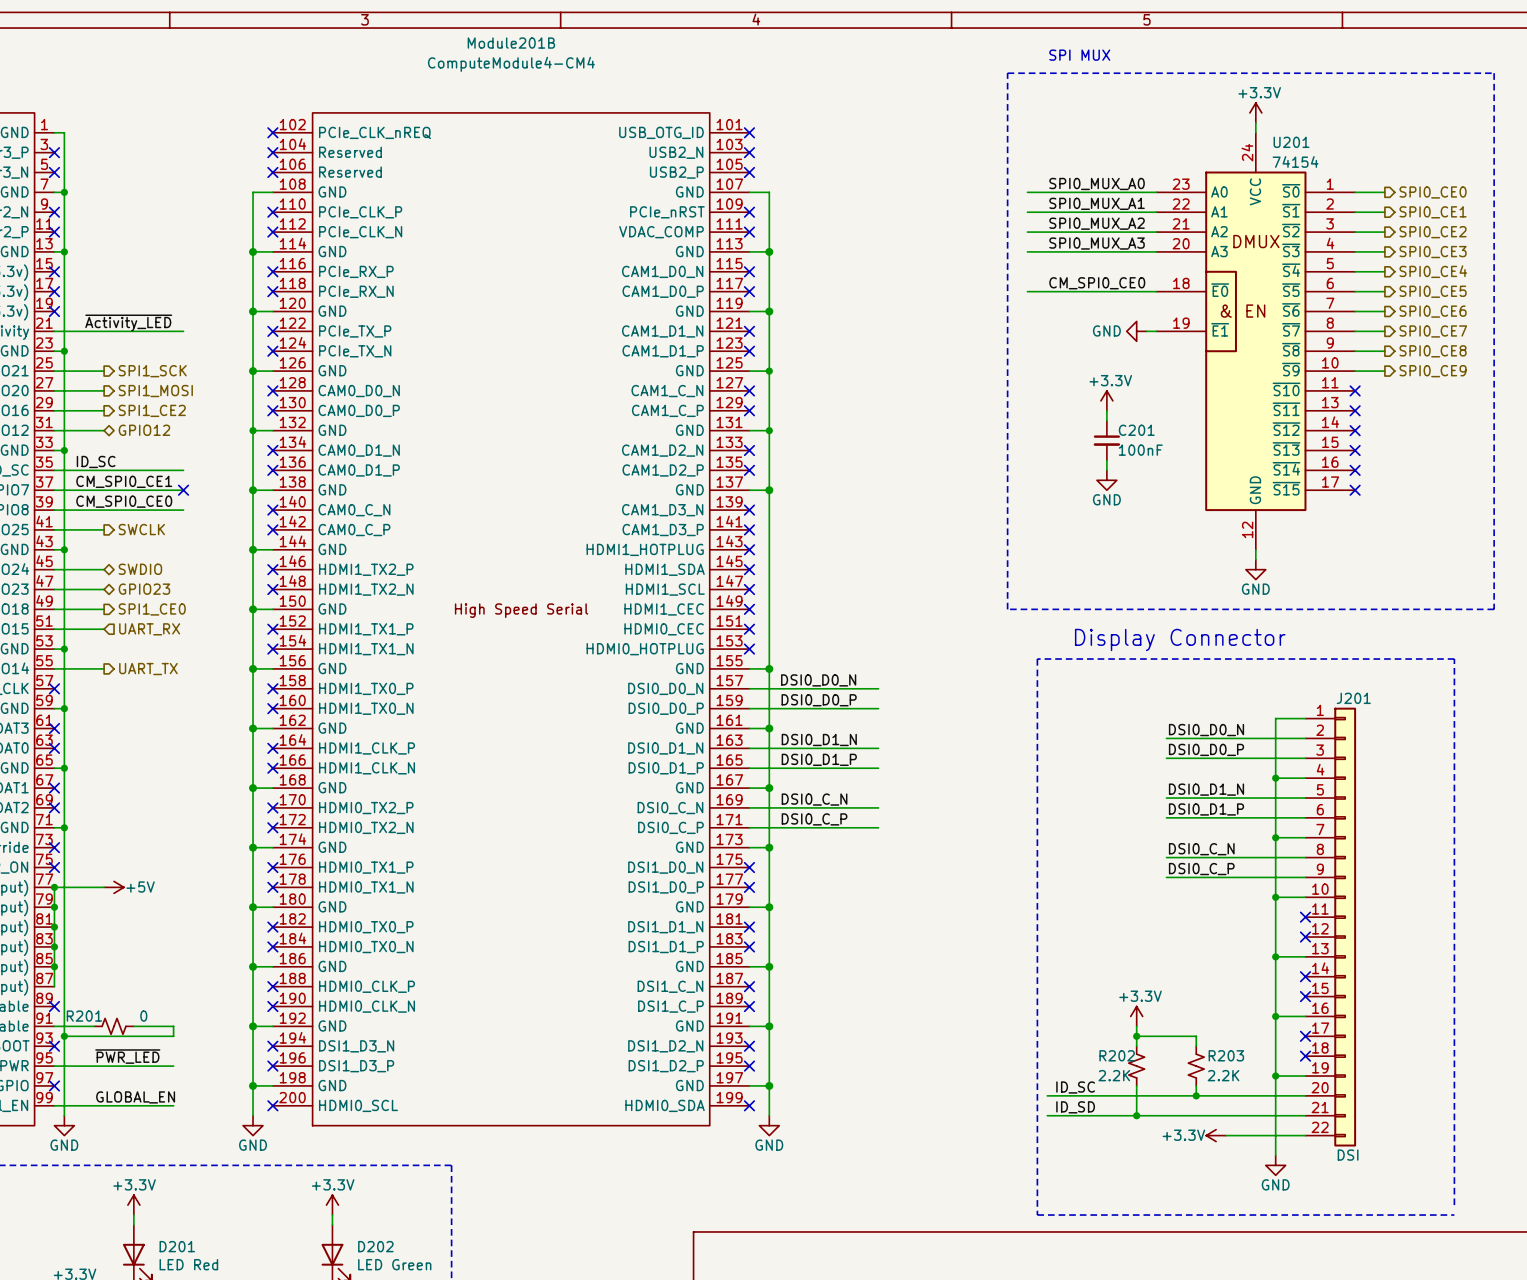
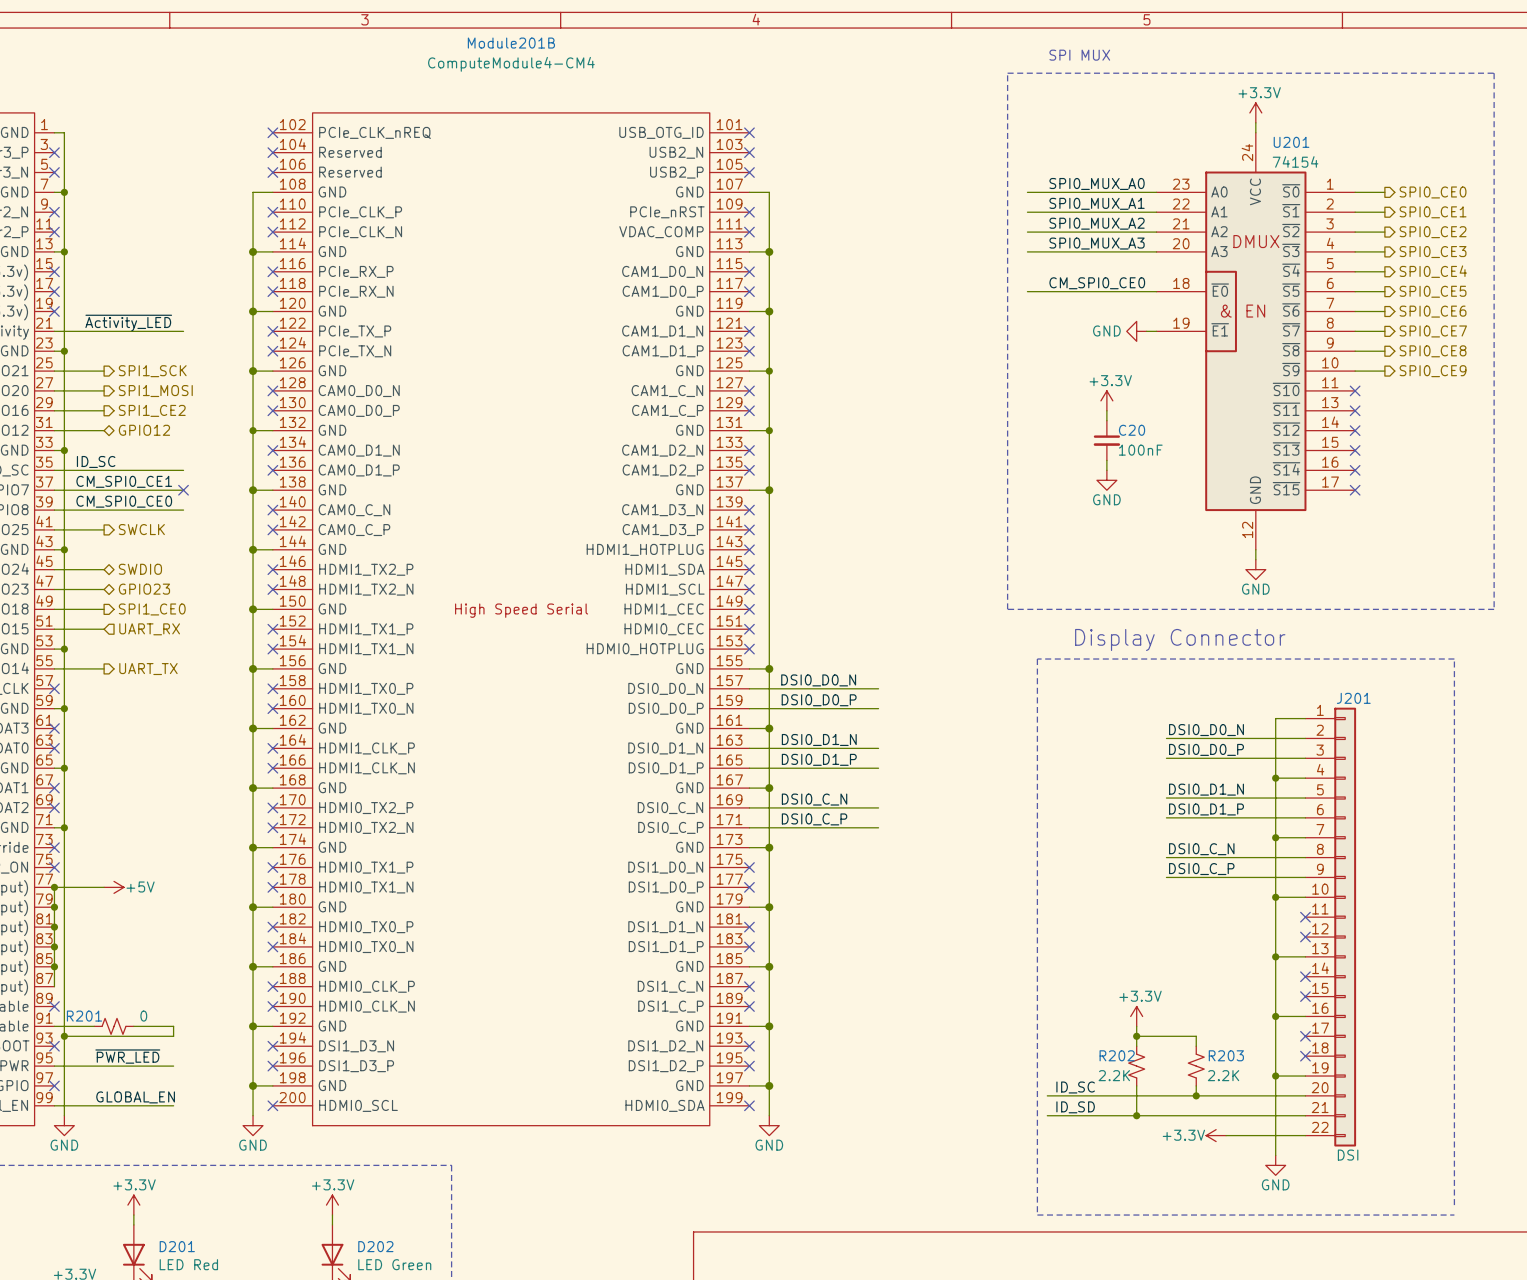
C201 name: C201 (1136, 430) -> C20 (1132, 430)

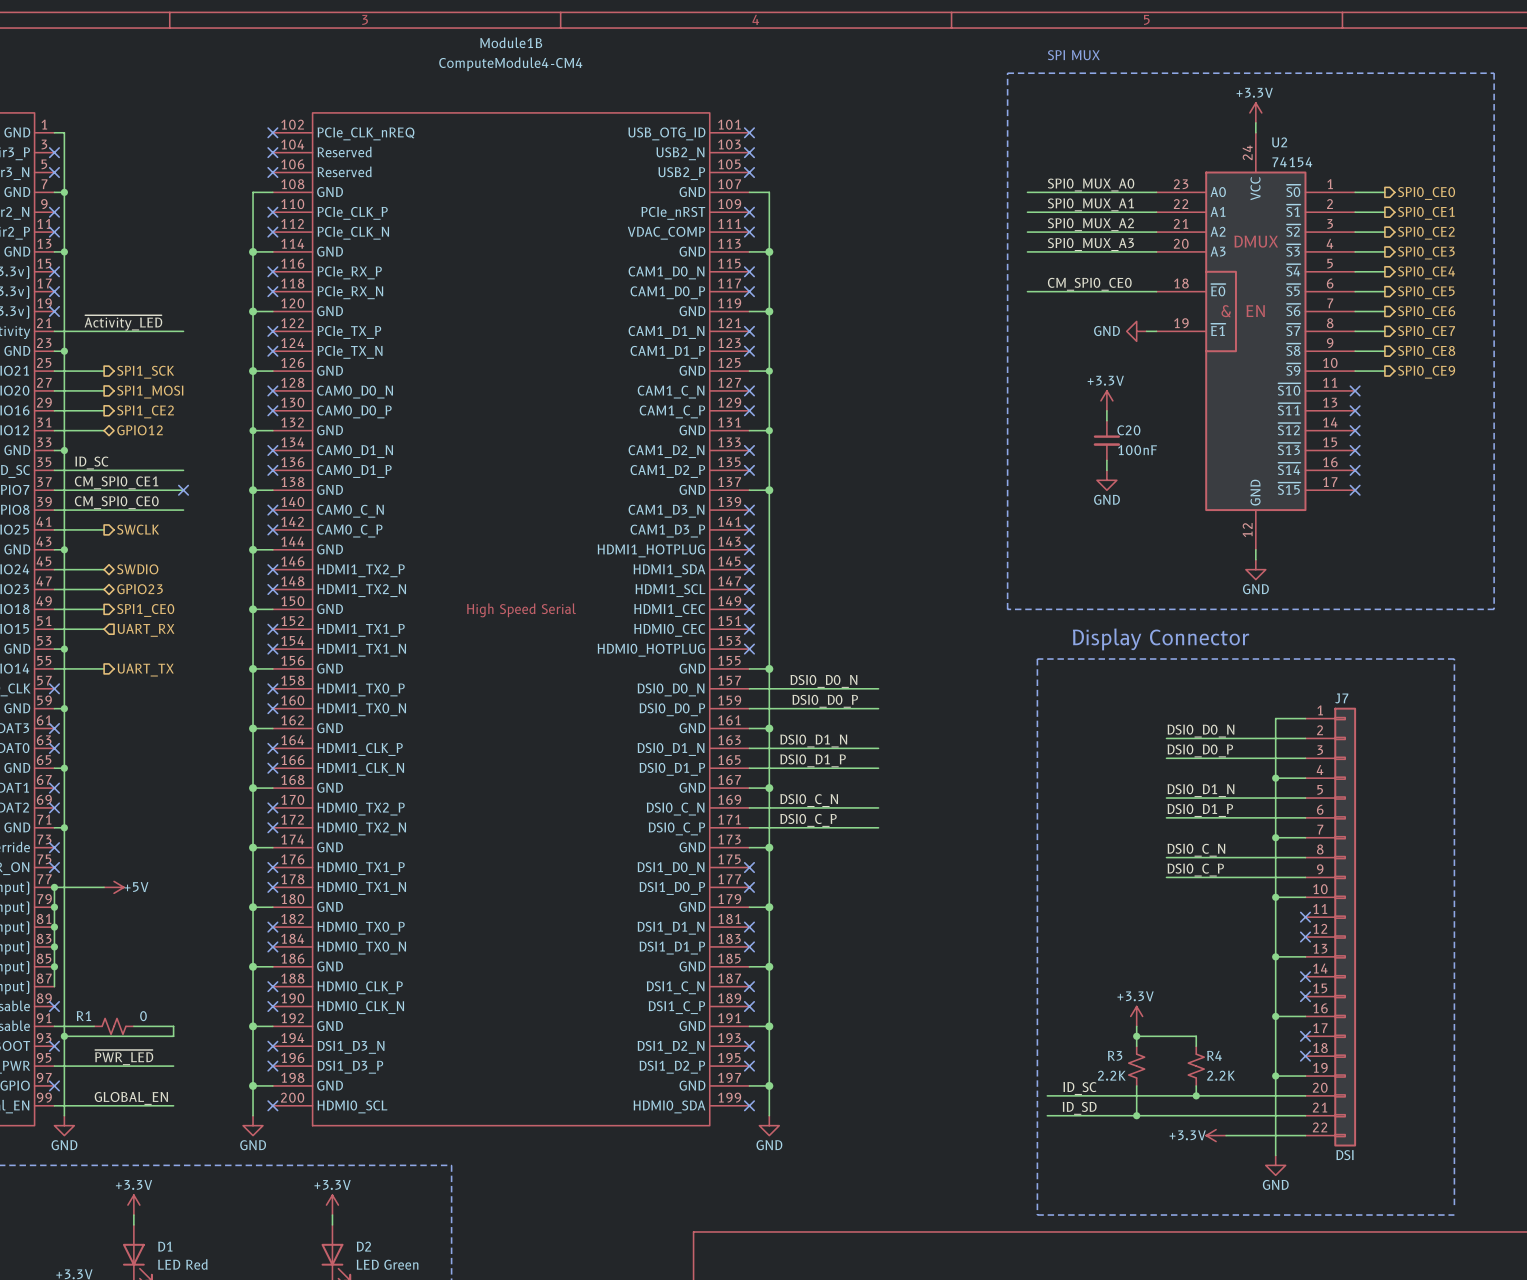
Module201B name: Module201B (511, 43) -> Module1B (511, 42)
U201 name: U201 (1291, 142) -> U2 (1279, 142)
J201 name: J201 (1353, 698) -> J7 (1341, 698)
R201 name: R201 (84, 1016) -> R1 (83, 1016)
R202 name: R202 (1117, 1055) -> R3 (1115, 1055)
R203 name: R203 (1226, 1055) -> R4 (1214, 1055)
D201 name: D201 (177, 1246) -> D1 (165, 1246)
D202 name: D202 (375, 1246) -> D2 (363, 1246)

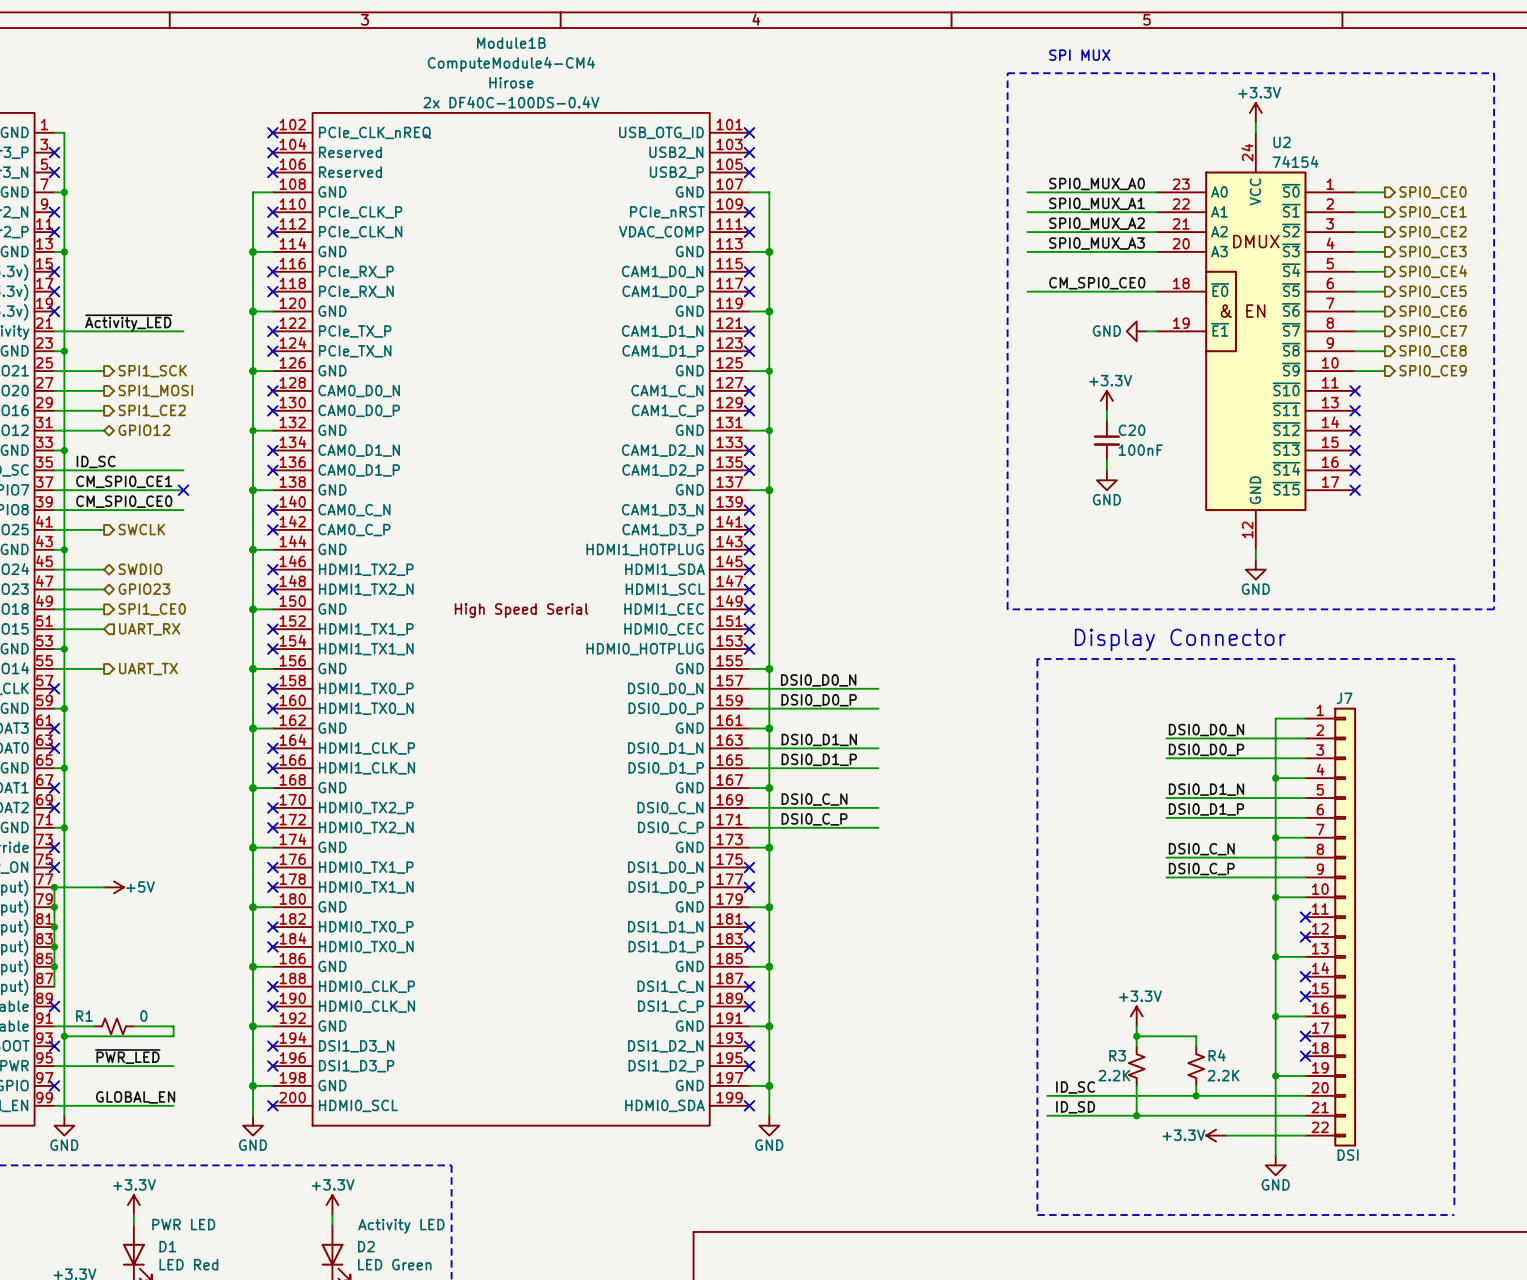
Module1B text: none -> Hirose (511, 82)
Module1B text: none -> 2x DF40C-100DS-0.4V (511, 102)
D1 text: none -> PWR LED (183, 1224)
D2 text: none -> Activity LED (401, 1226)

